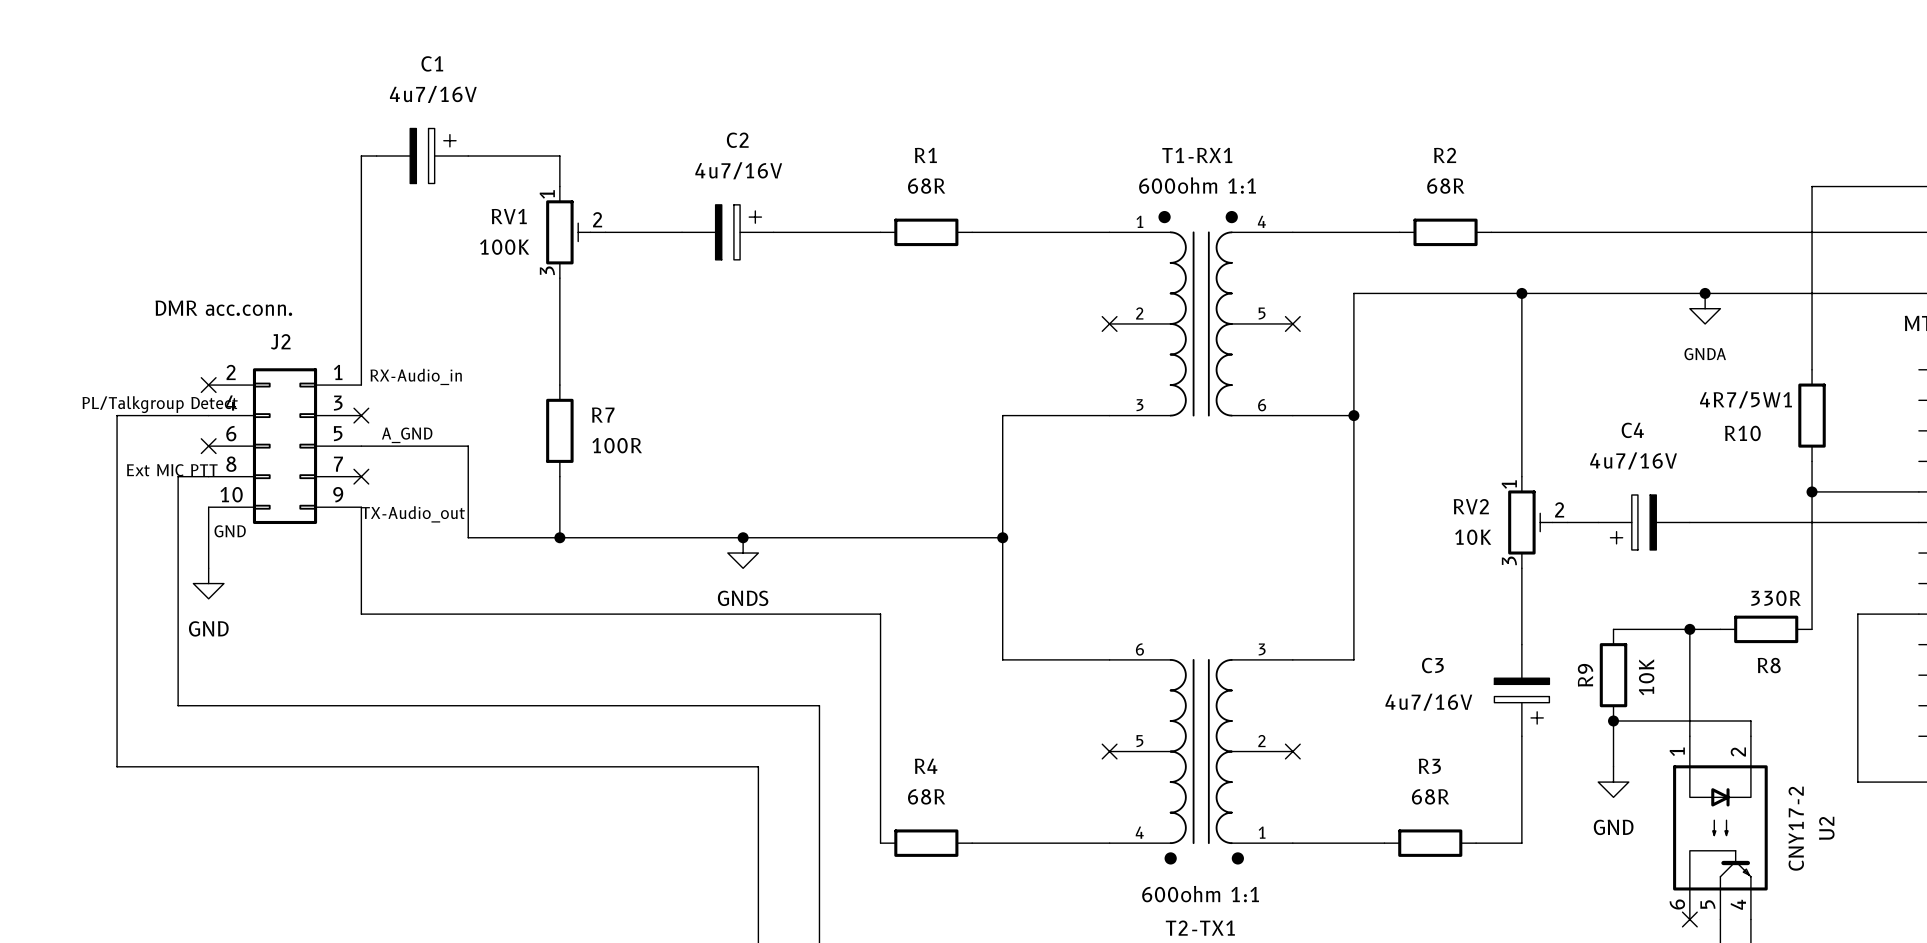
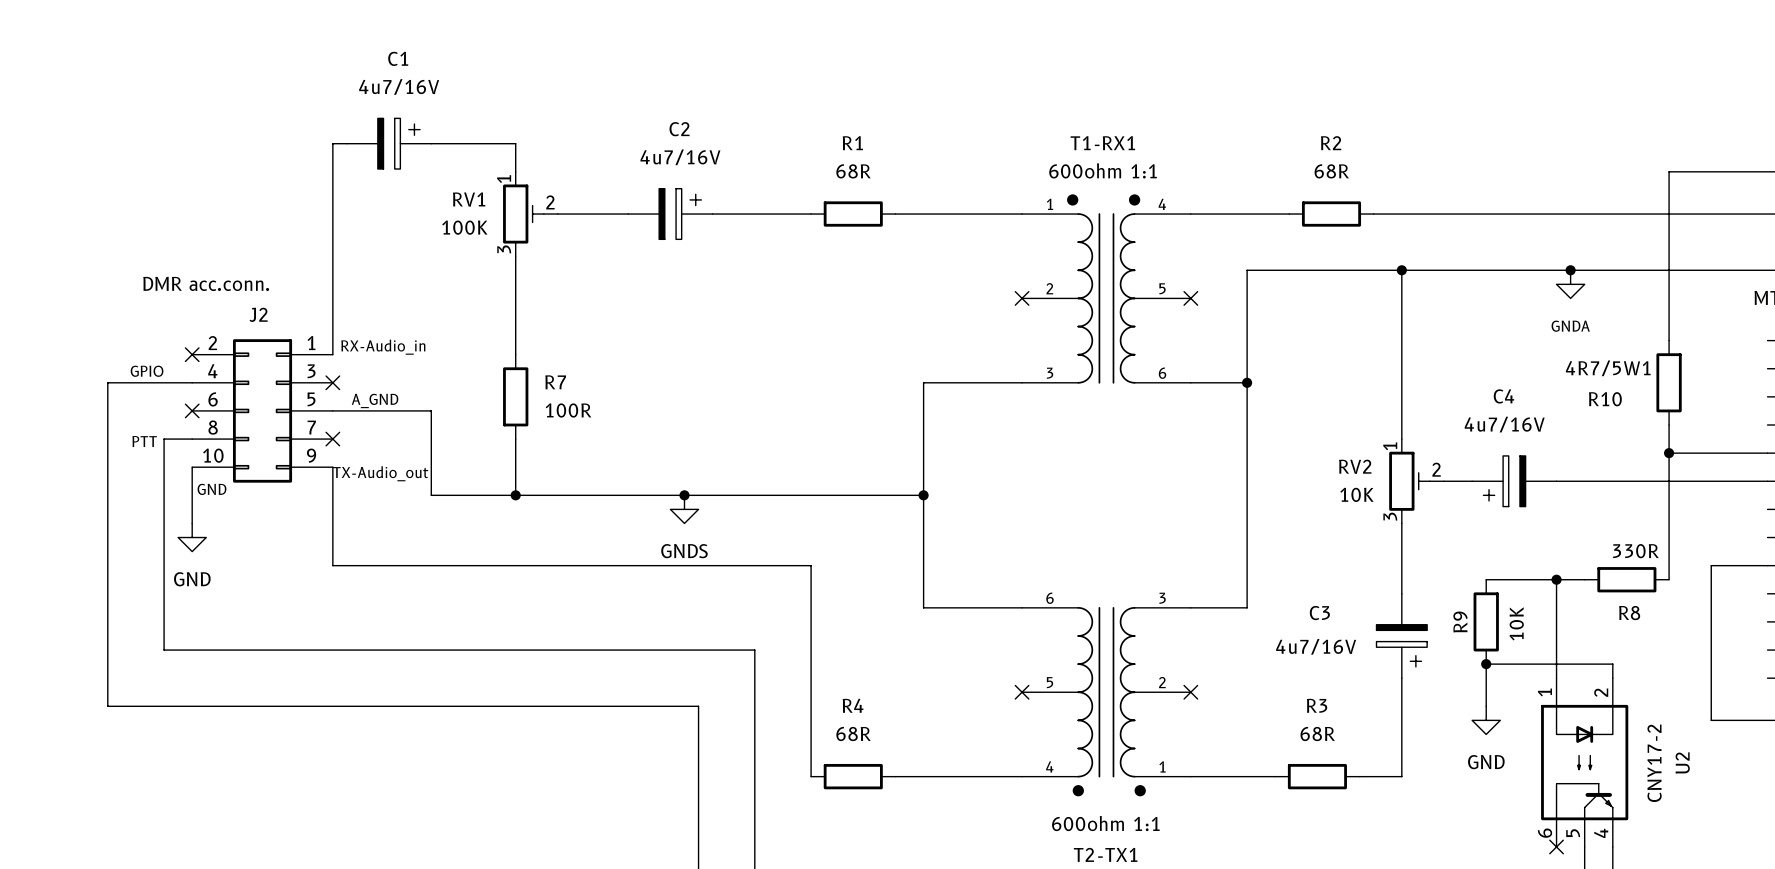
text: PL/Talkgroup Detect (160, 404) -> GPIO (147, 371)
text: Ext MIC PTT (172, 470) -> none
text: none -> PTT (144, 441)

